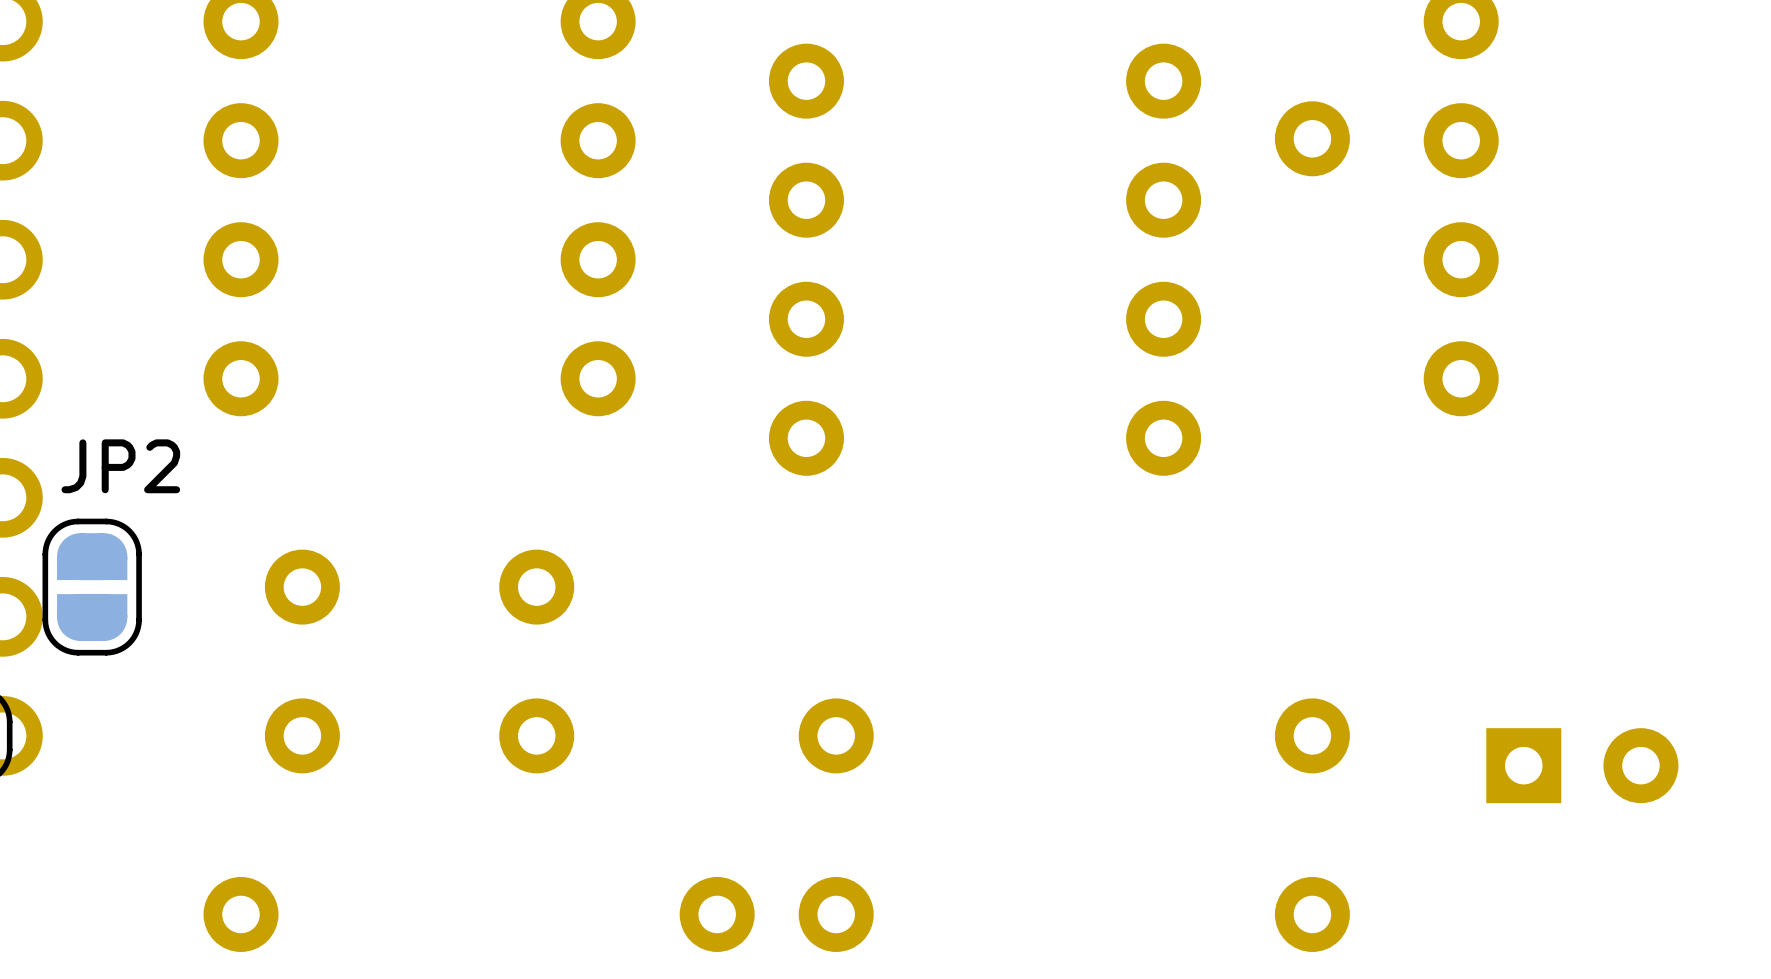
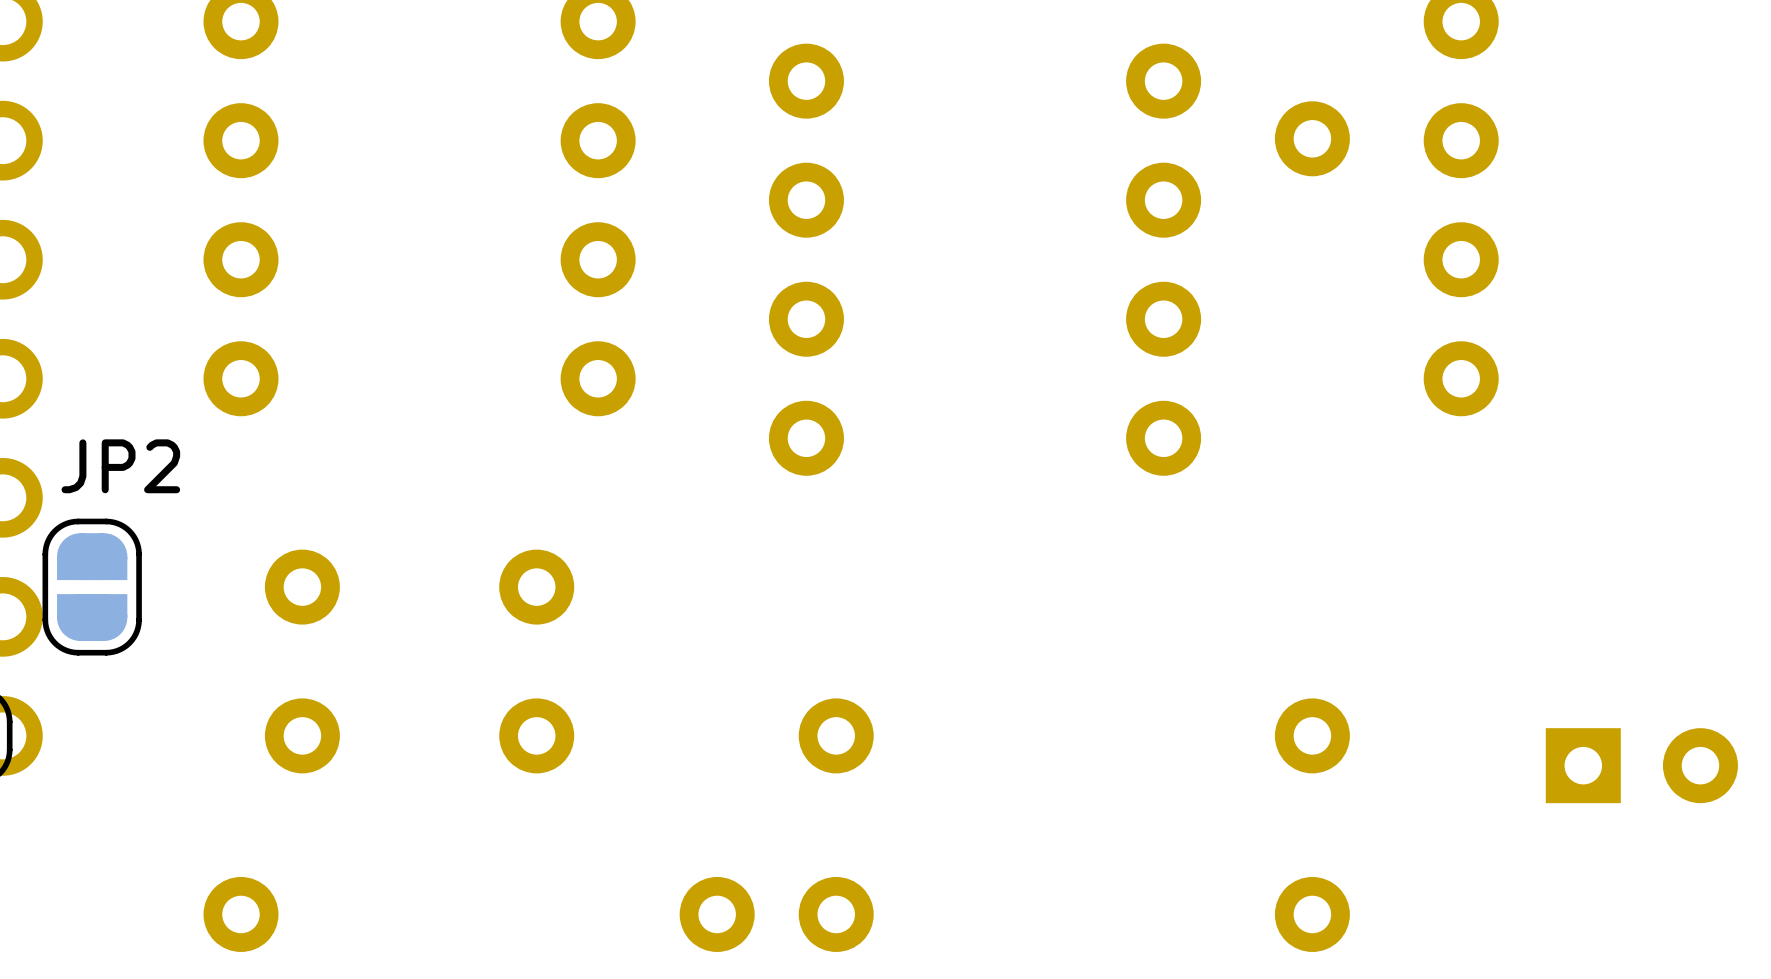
part position: (1582, 765) -> (1641, 765)

